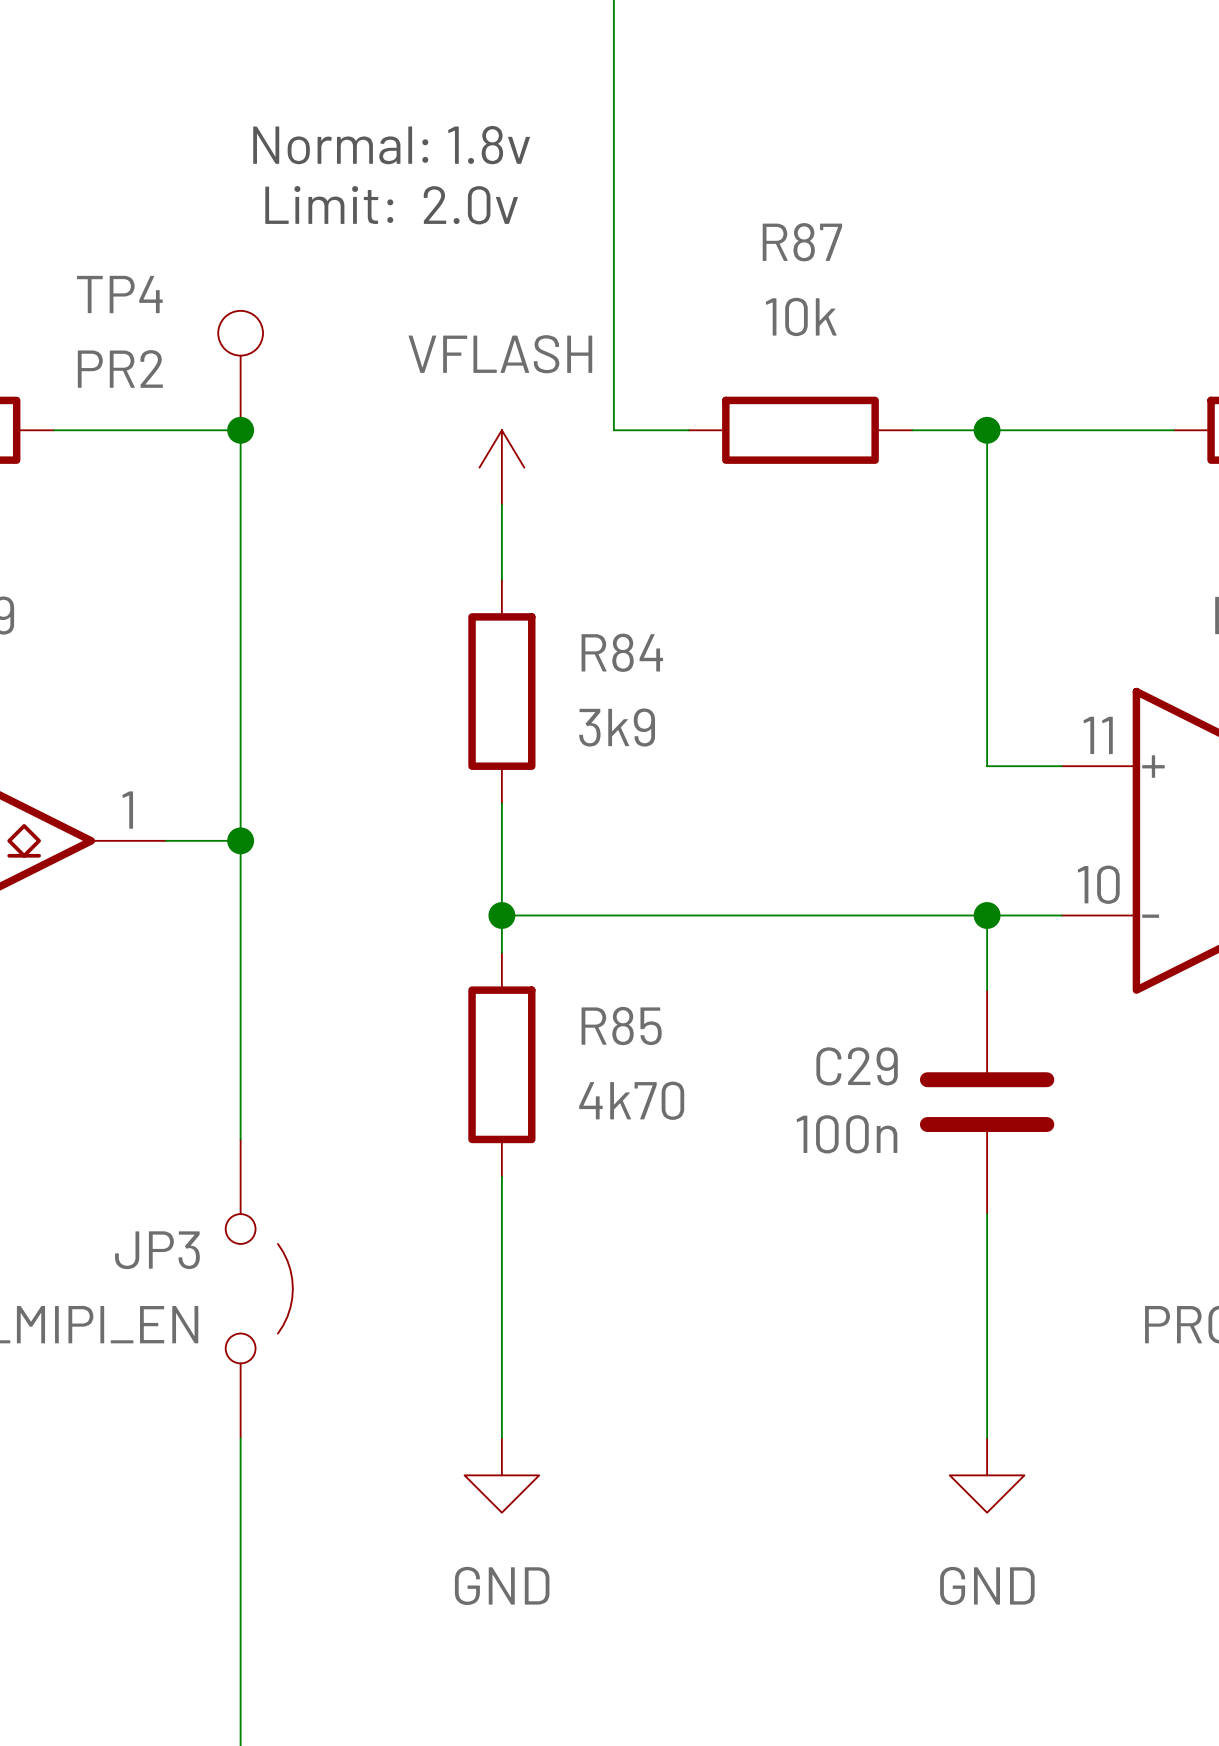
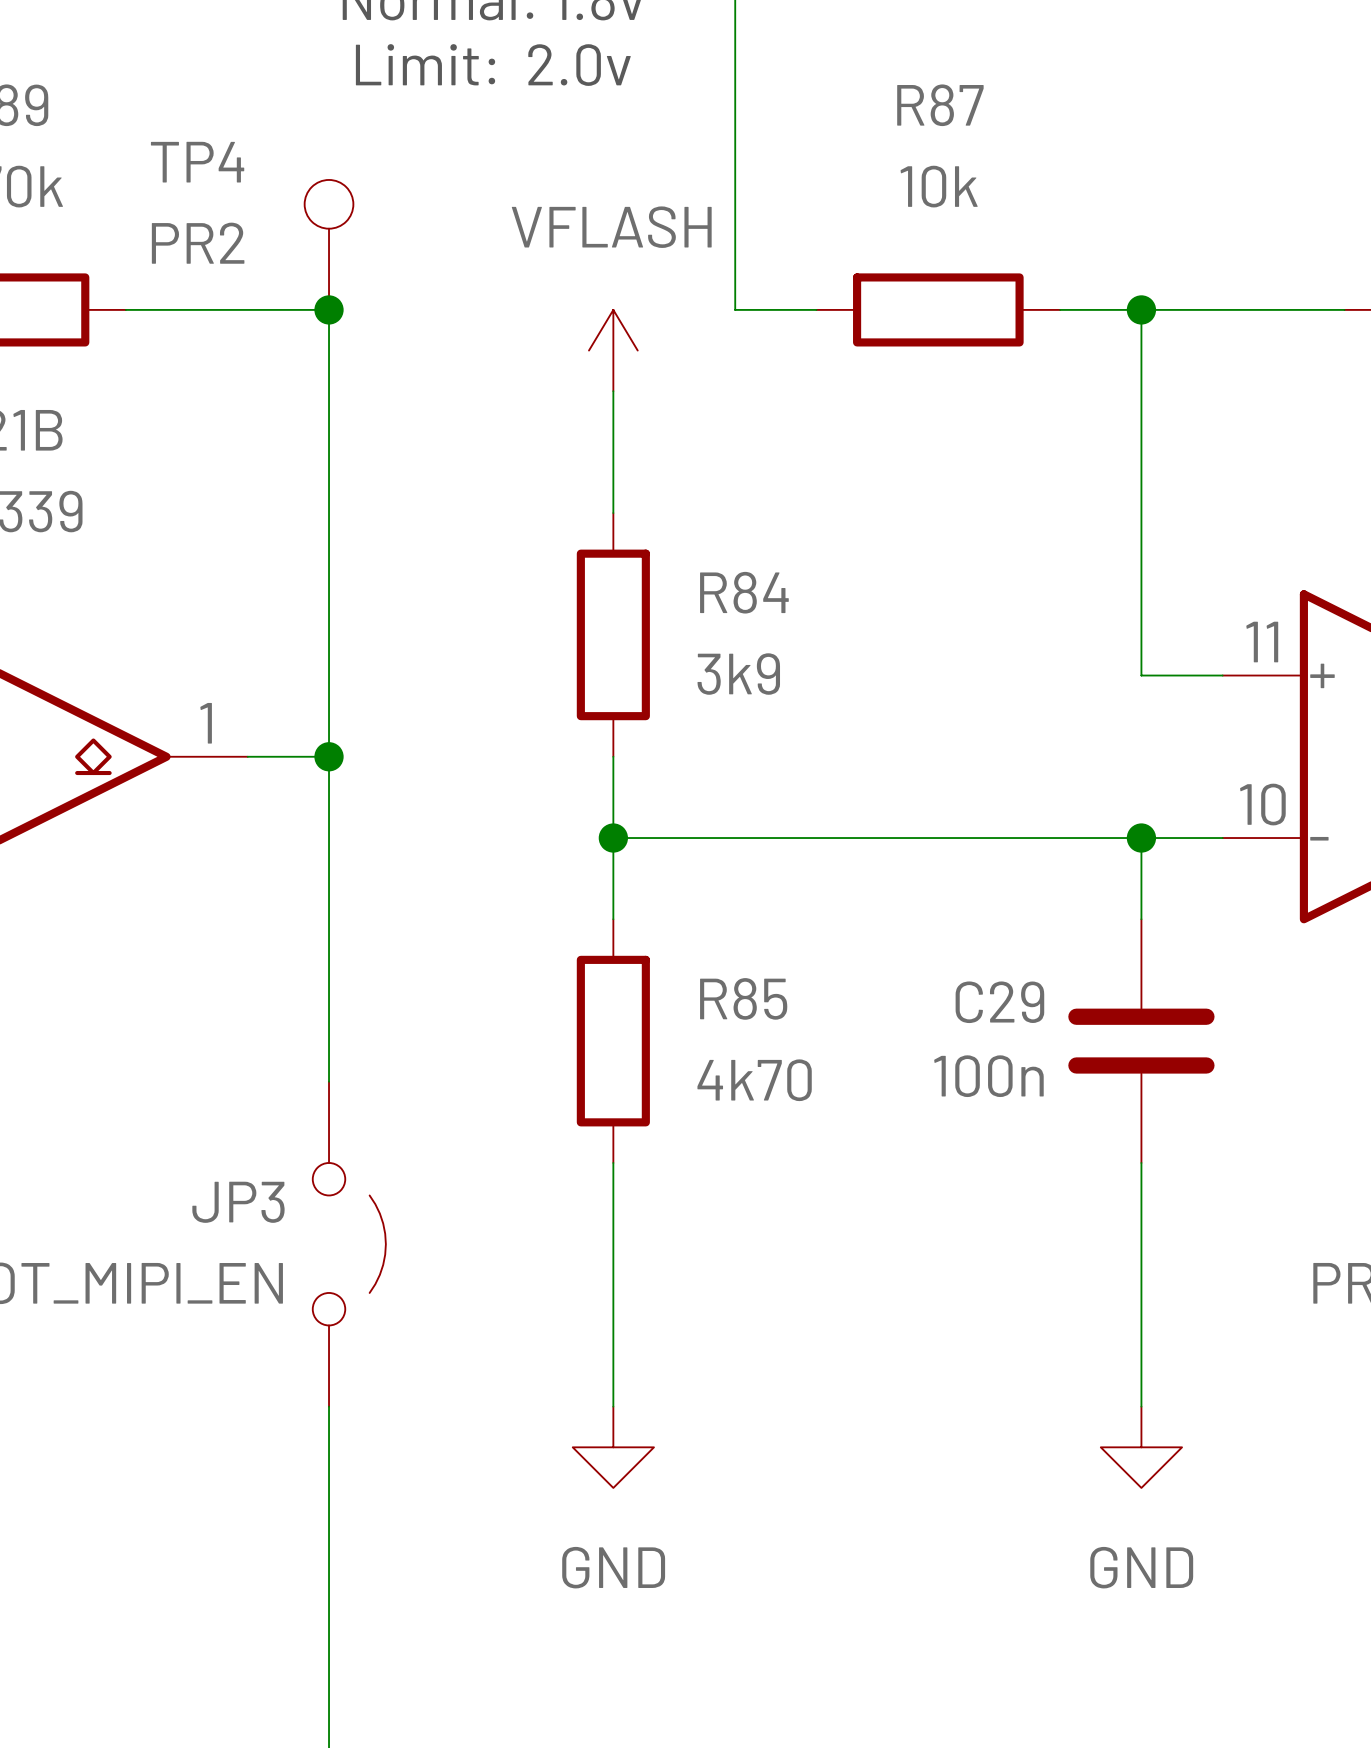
R84 position: (501, 691) -> (613, 634)
R85 position: (501, 1064) -> (613, 1041)

